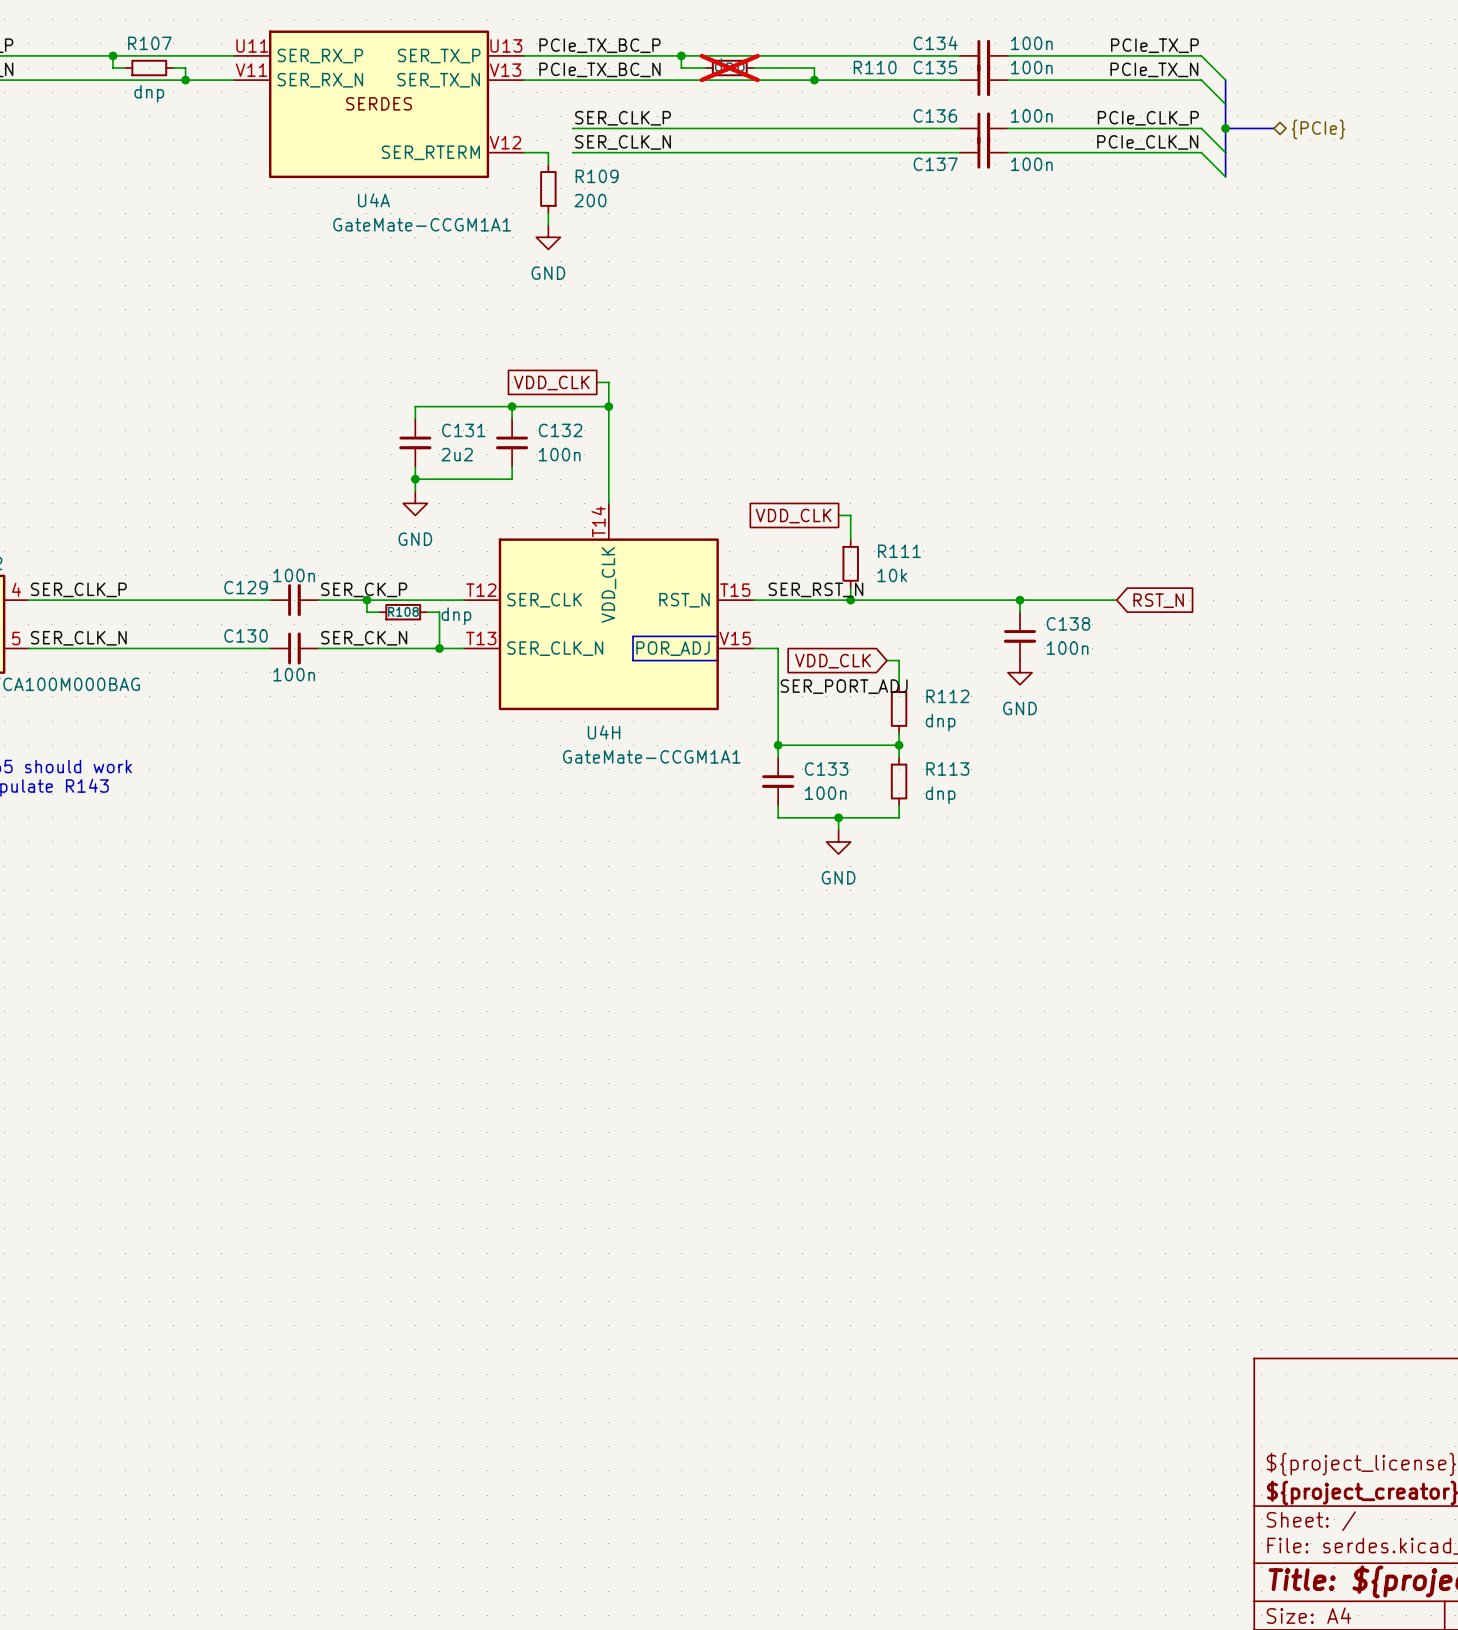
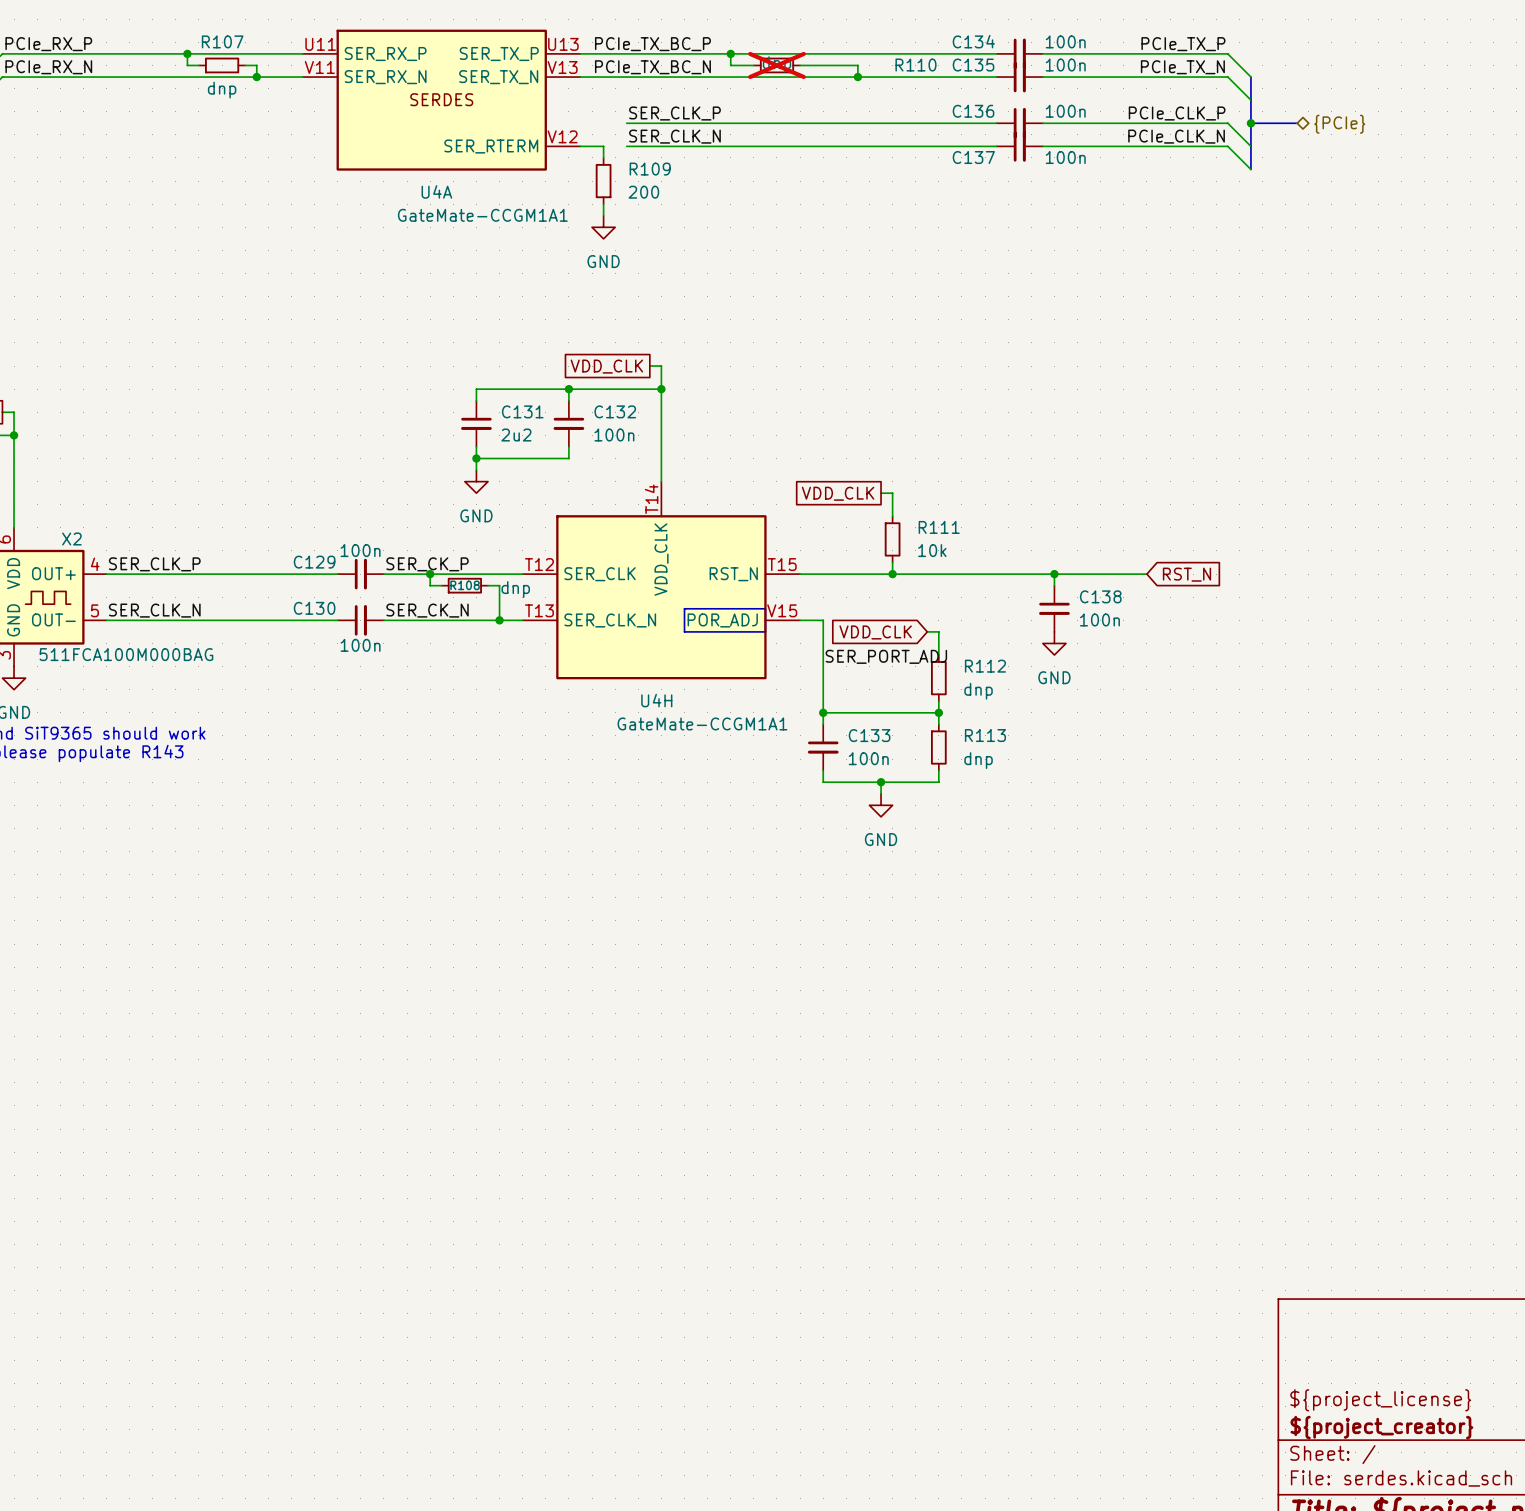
label: SER_RST_N (815, 589) -> none

